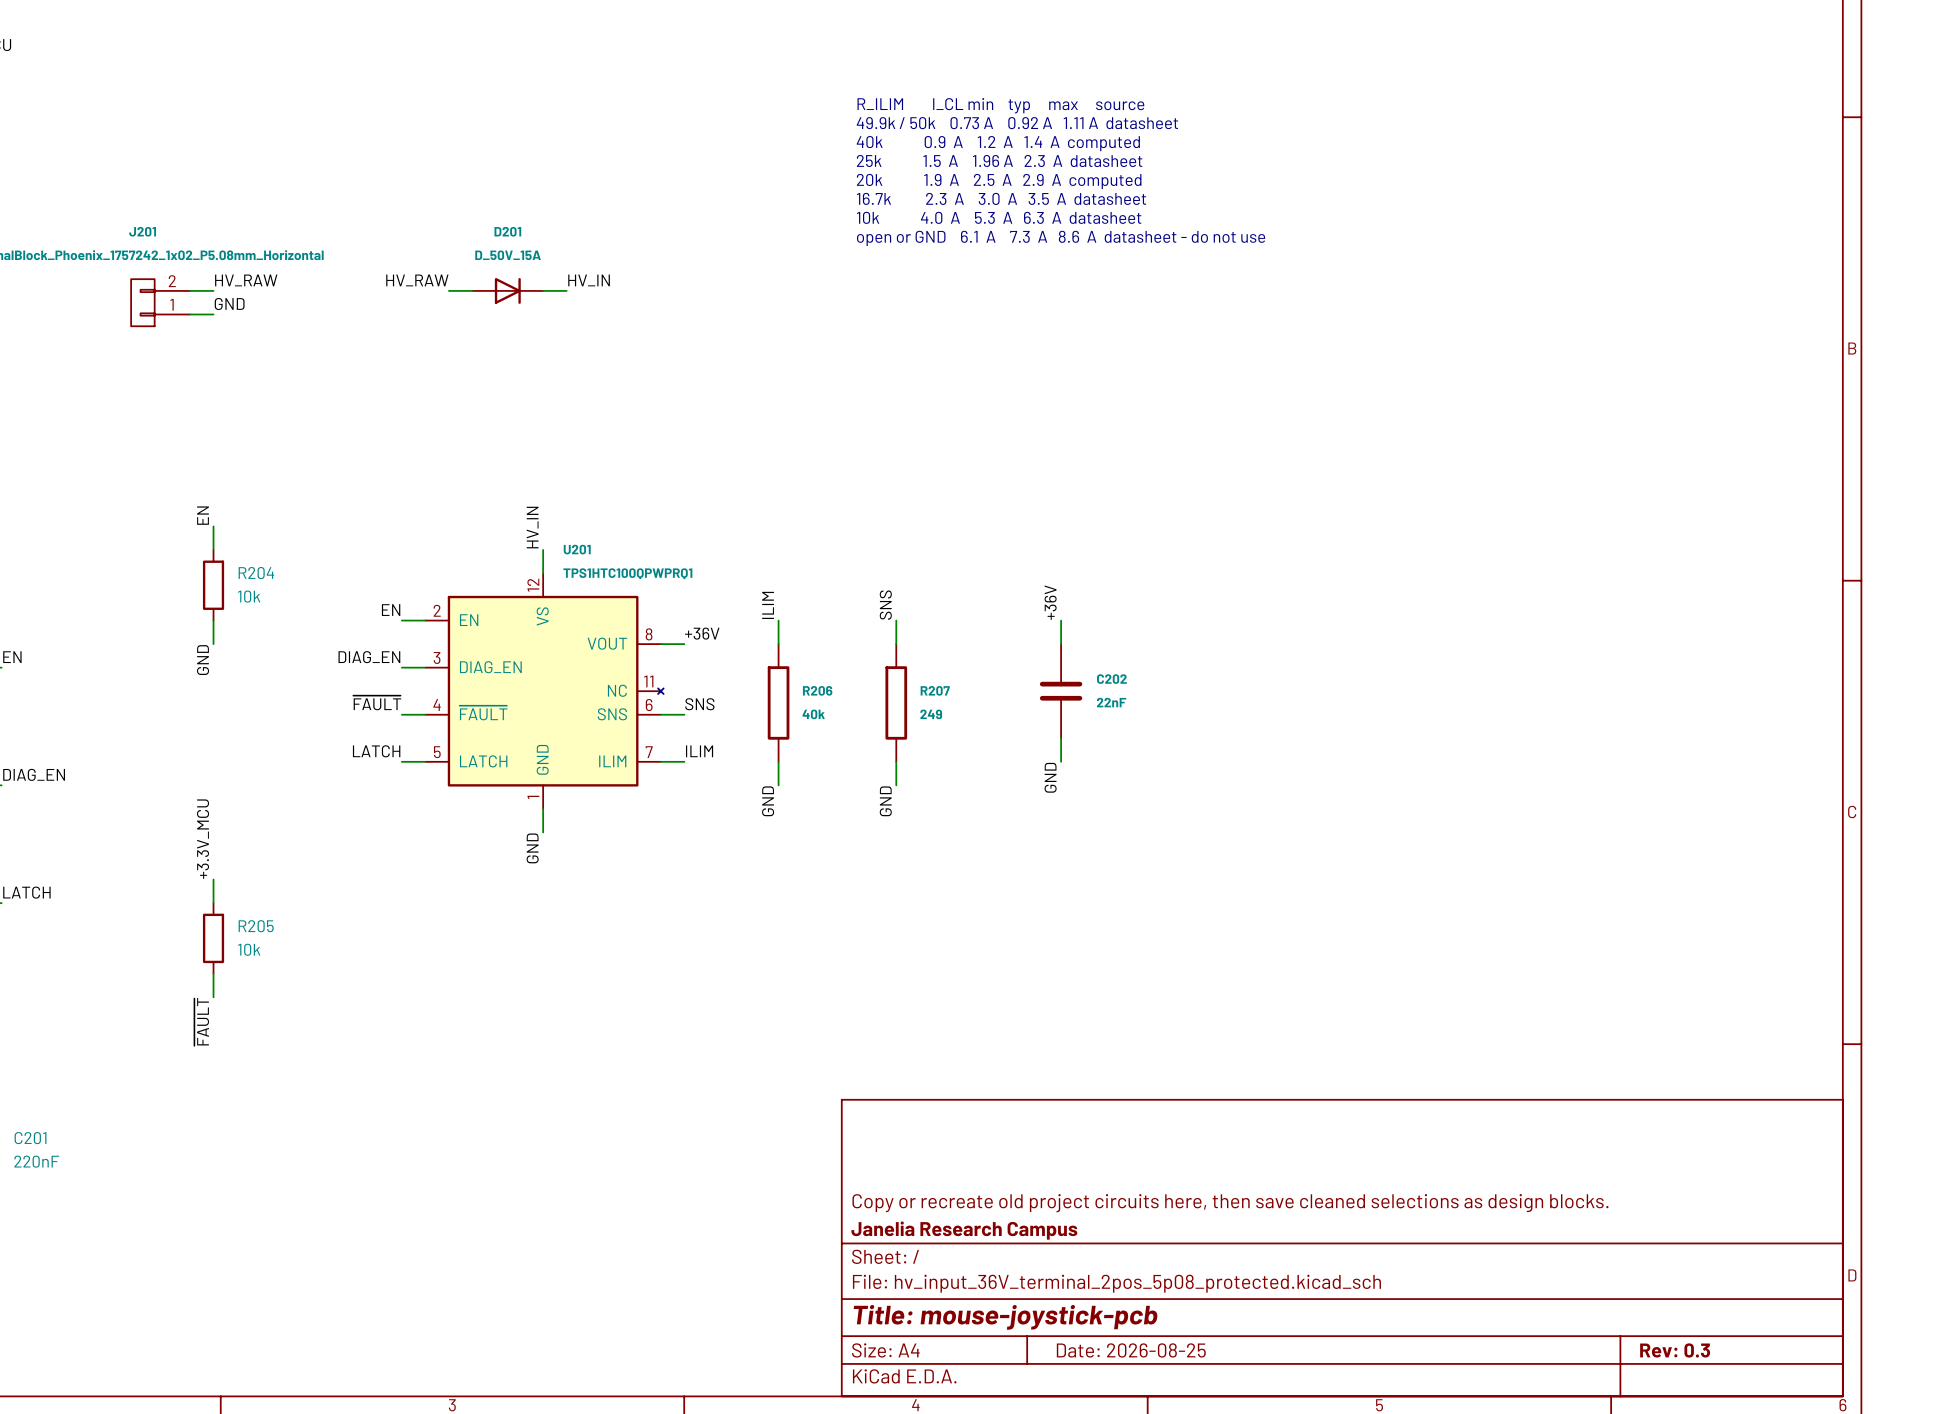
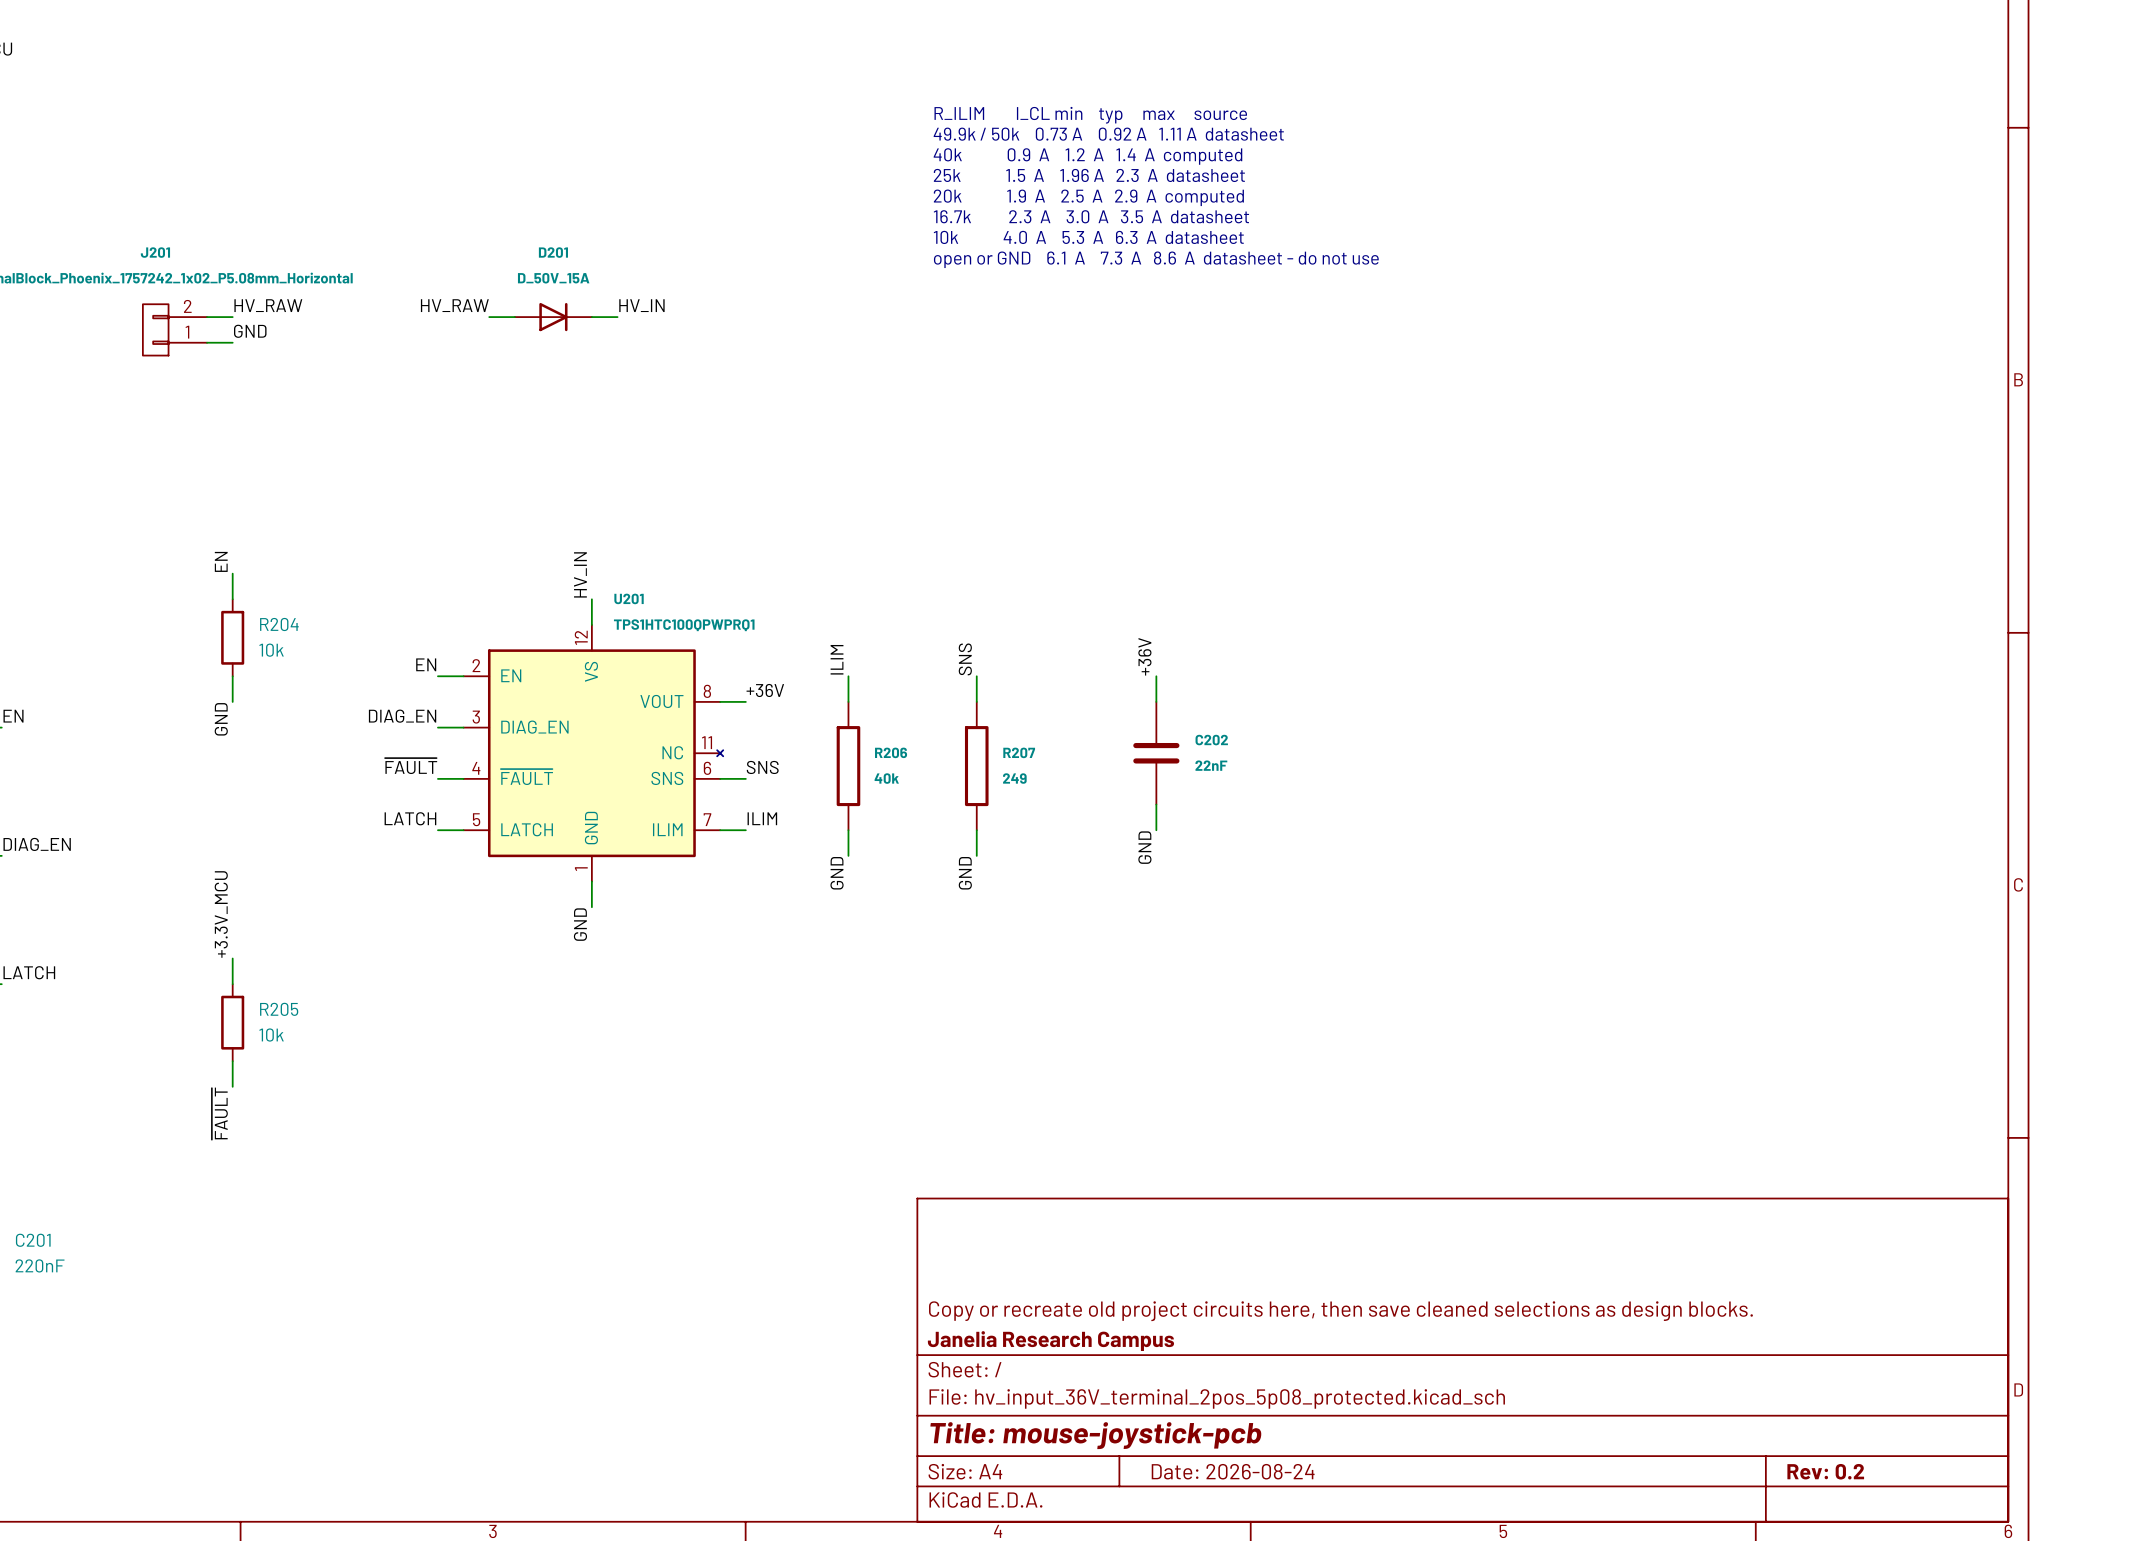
title block: Date: 2026-08-25 (1131, 1350) -> Date: 2026-08-24 (1233, 1471)
title block: Rev: 0.3 (1675, 1350) -> Rev: 0.2 (1825, 1471)

